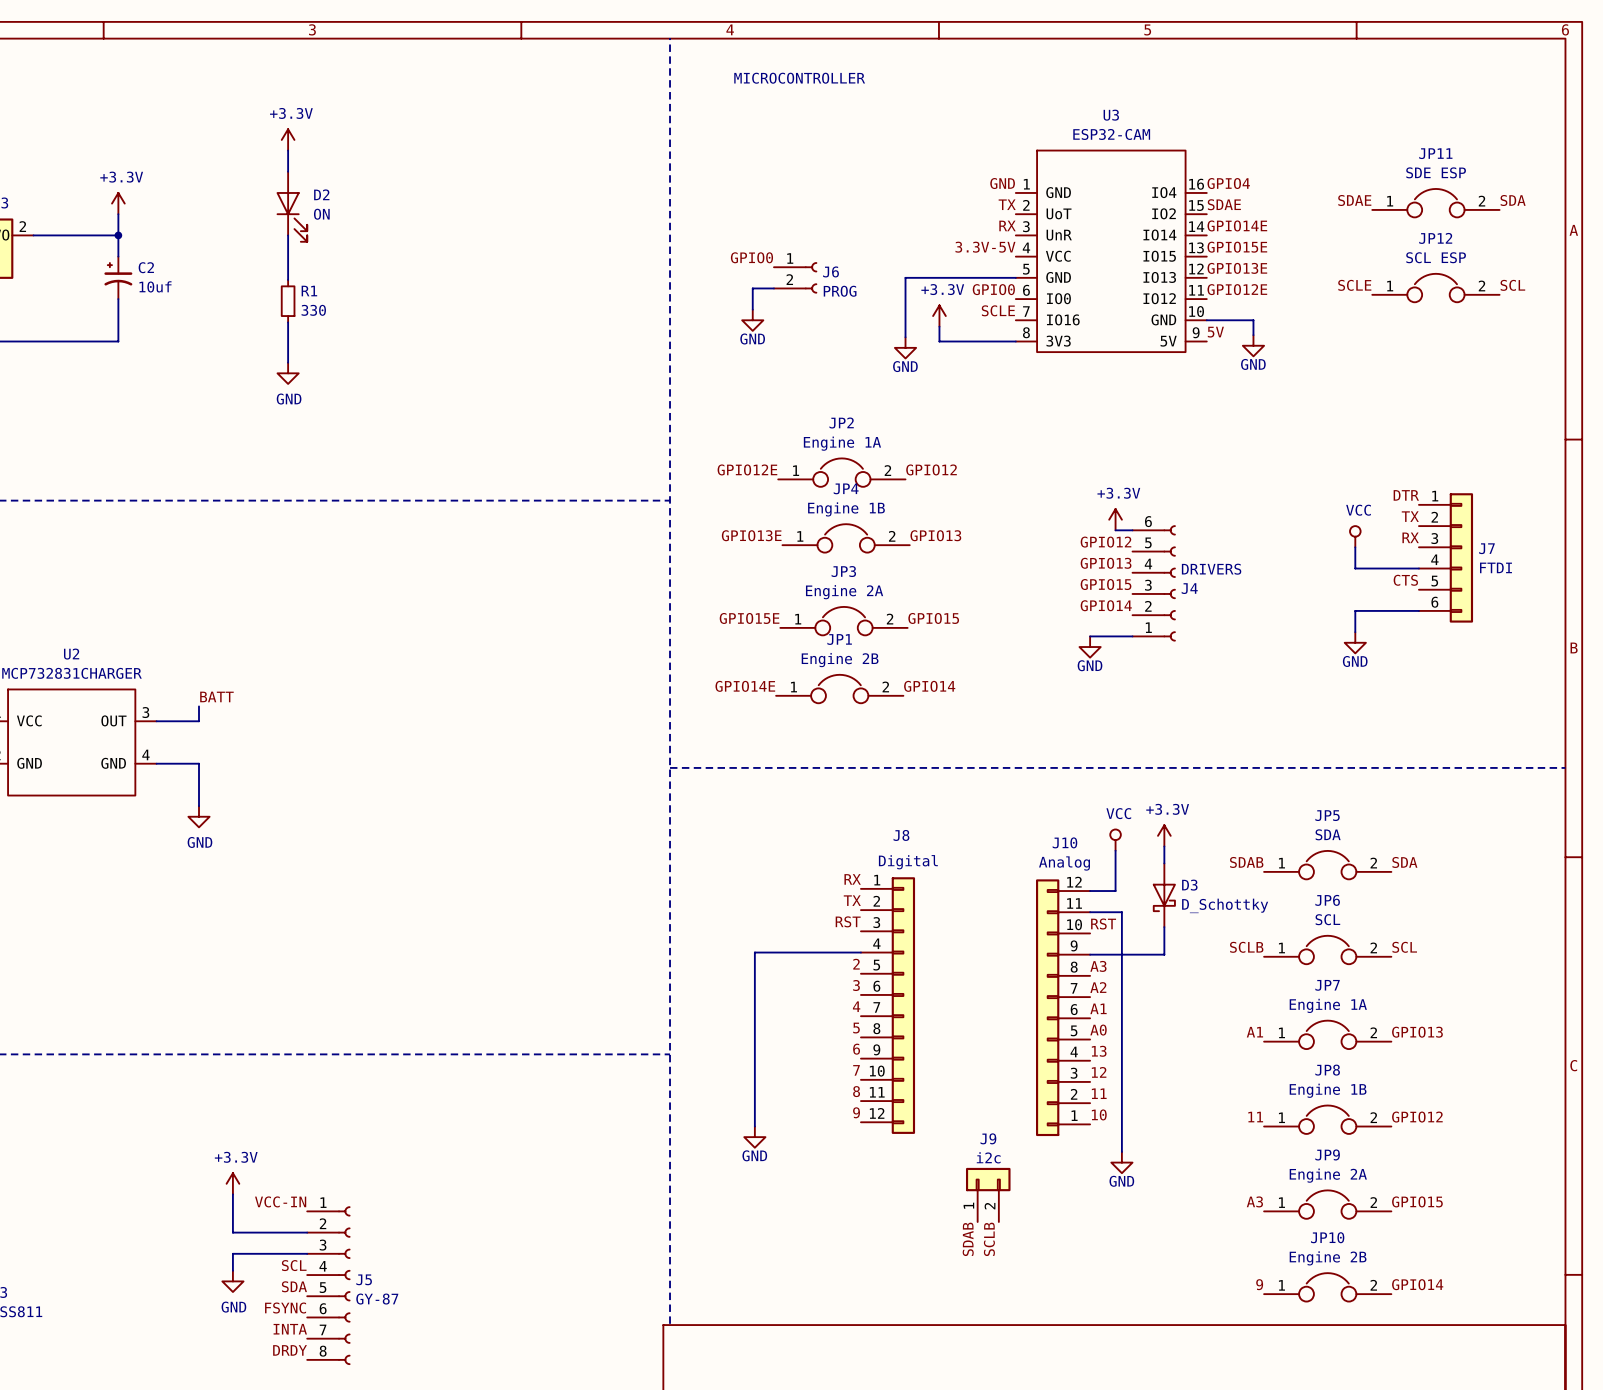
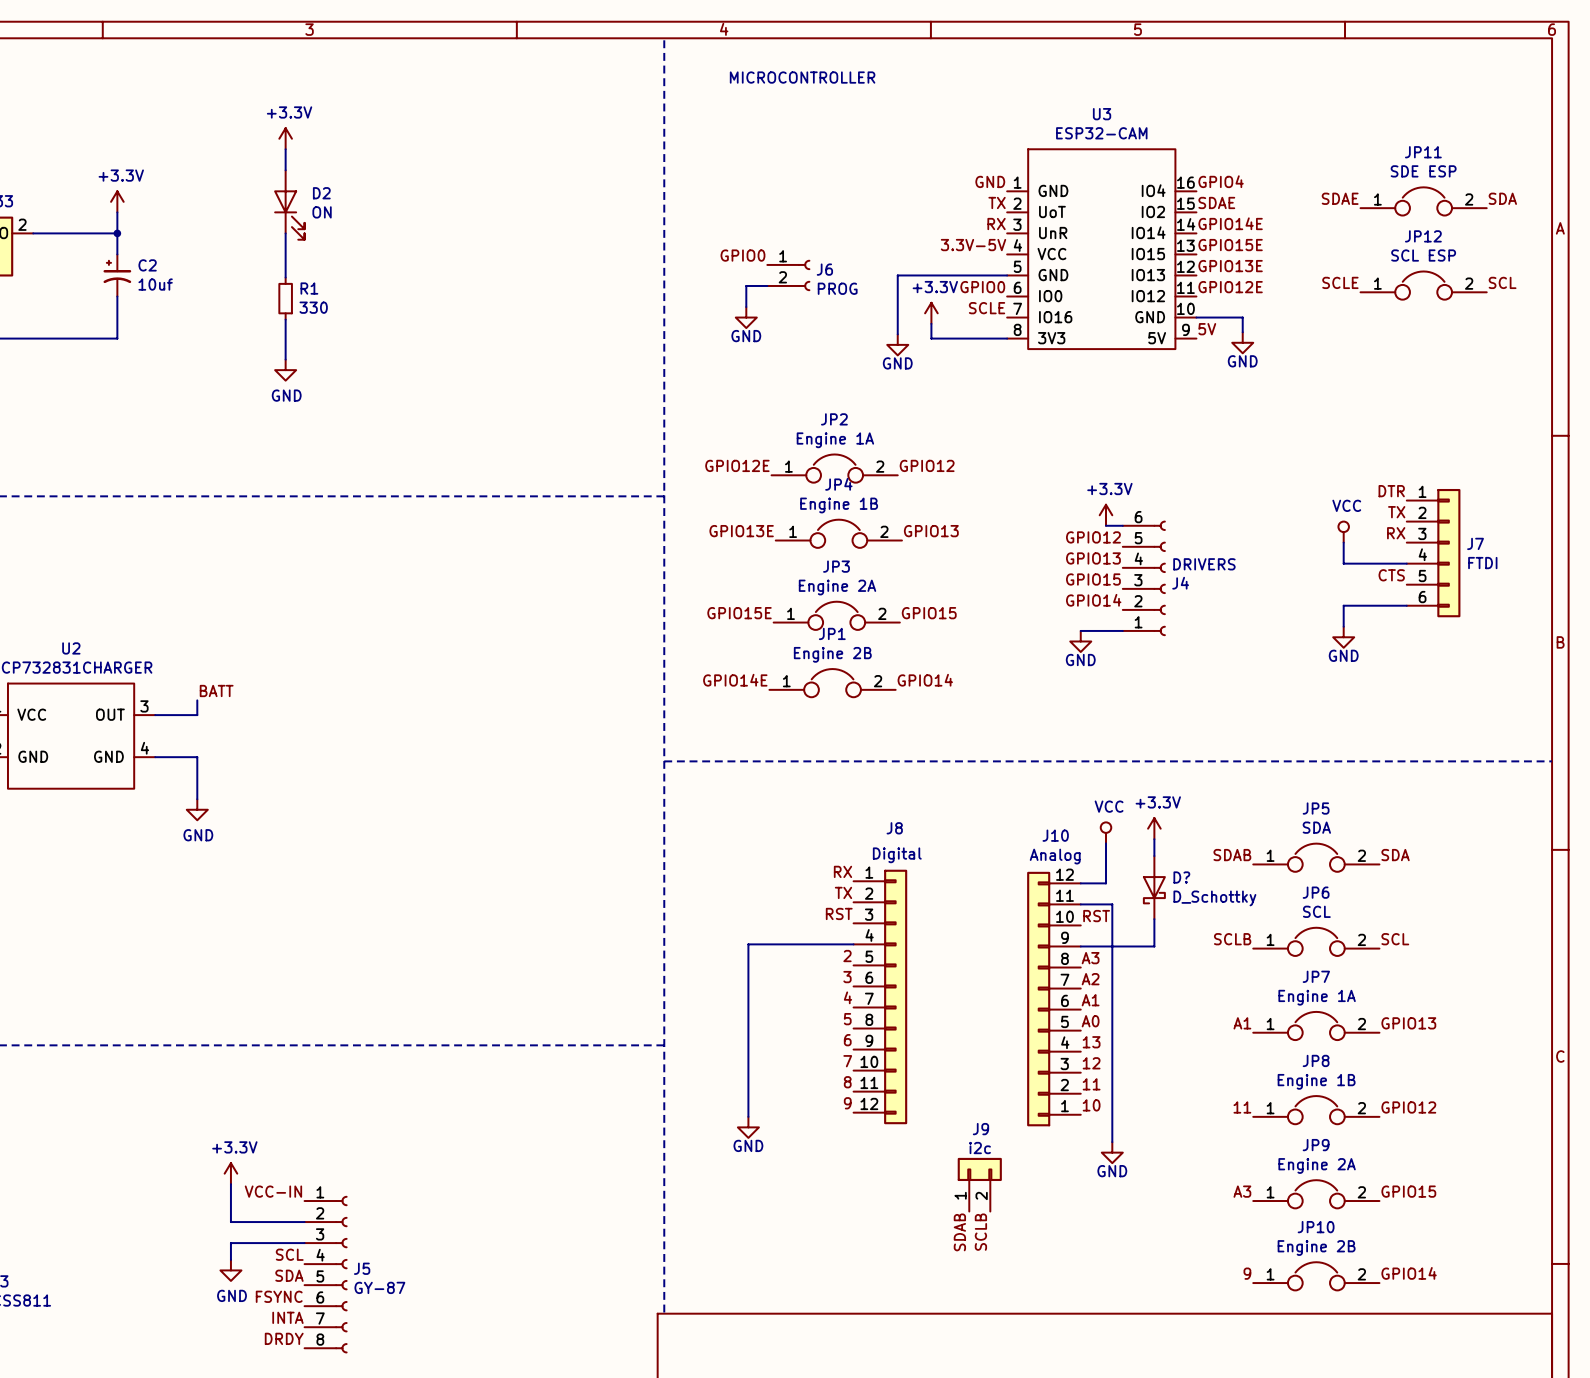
D3 name: D3 (1189, 885) -> D? (1181, 877)

